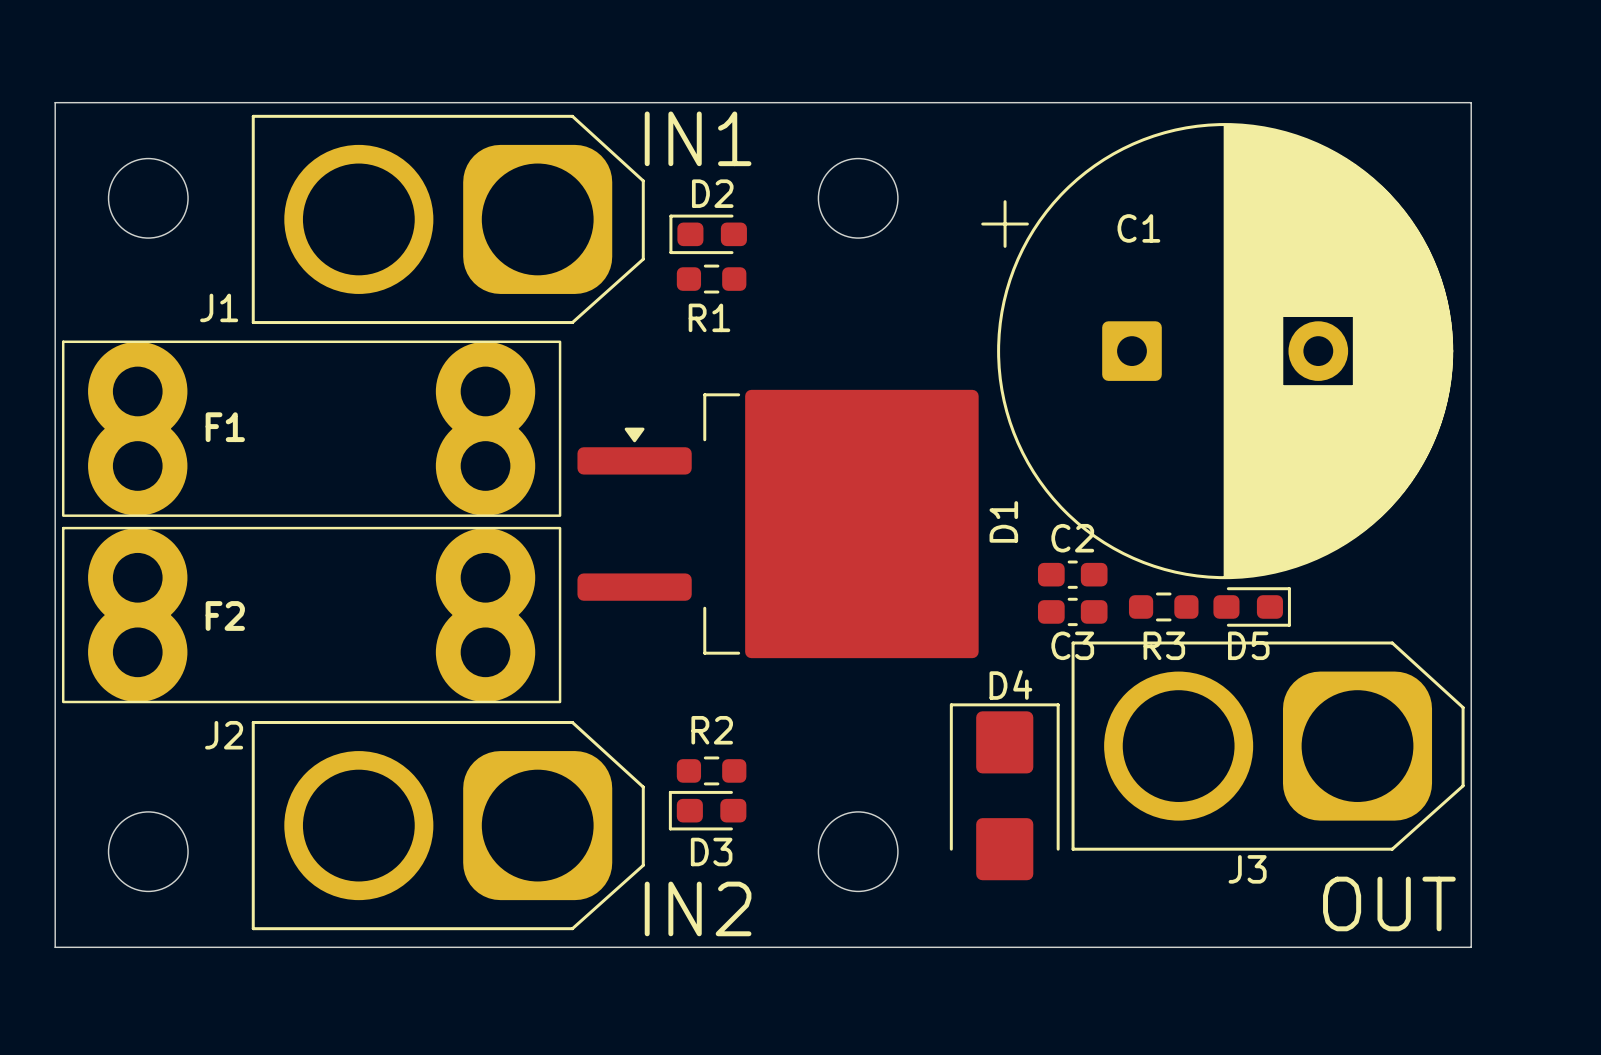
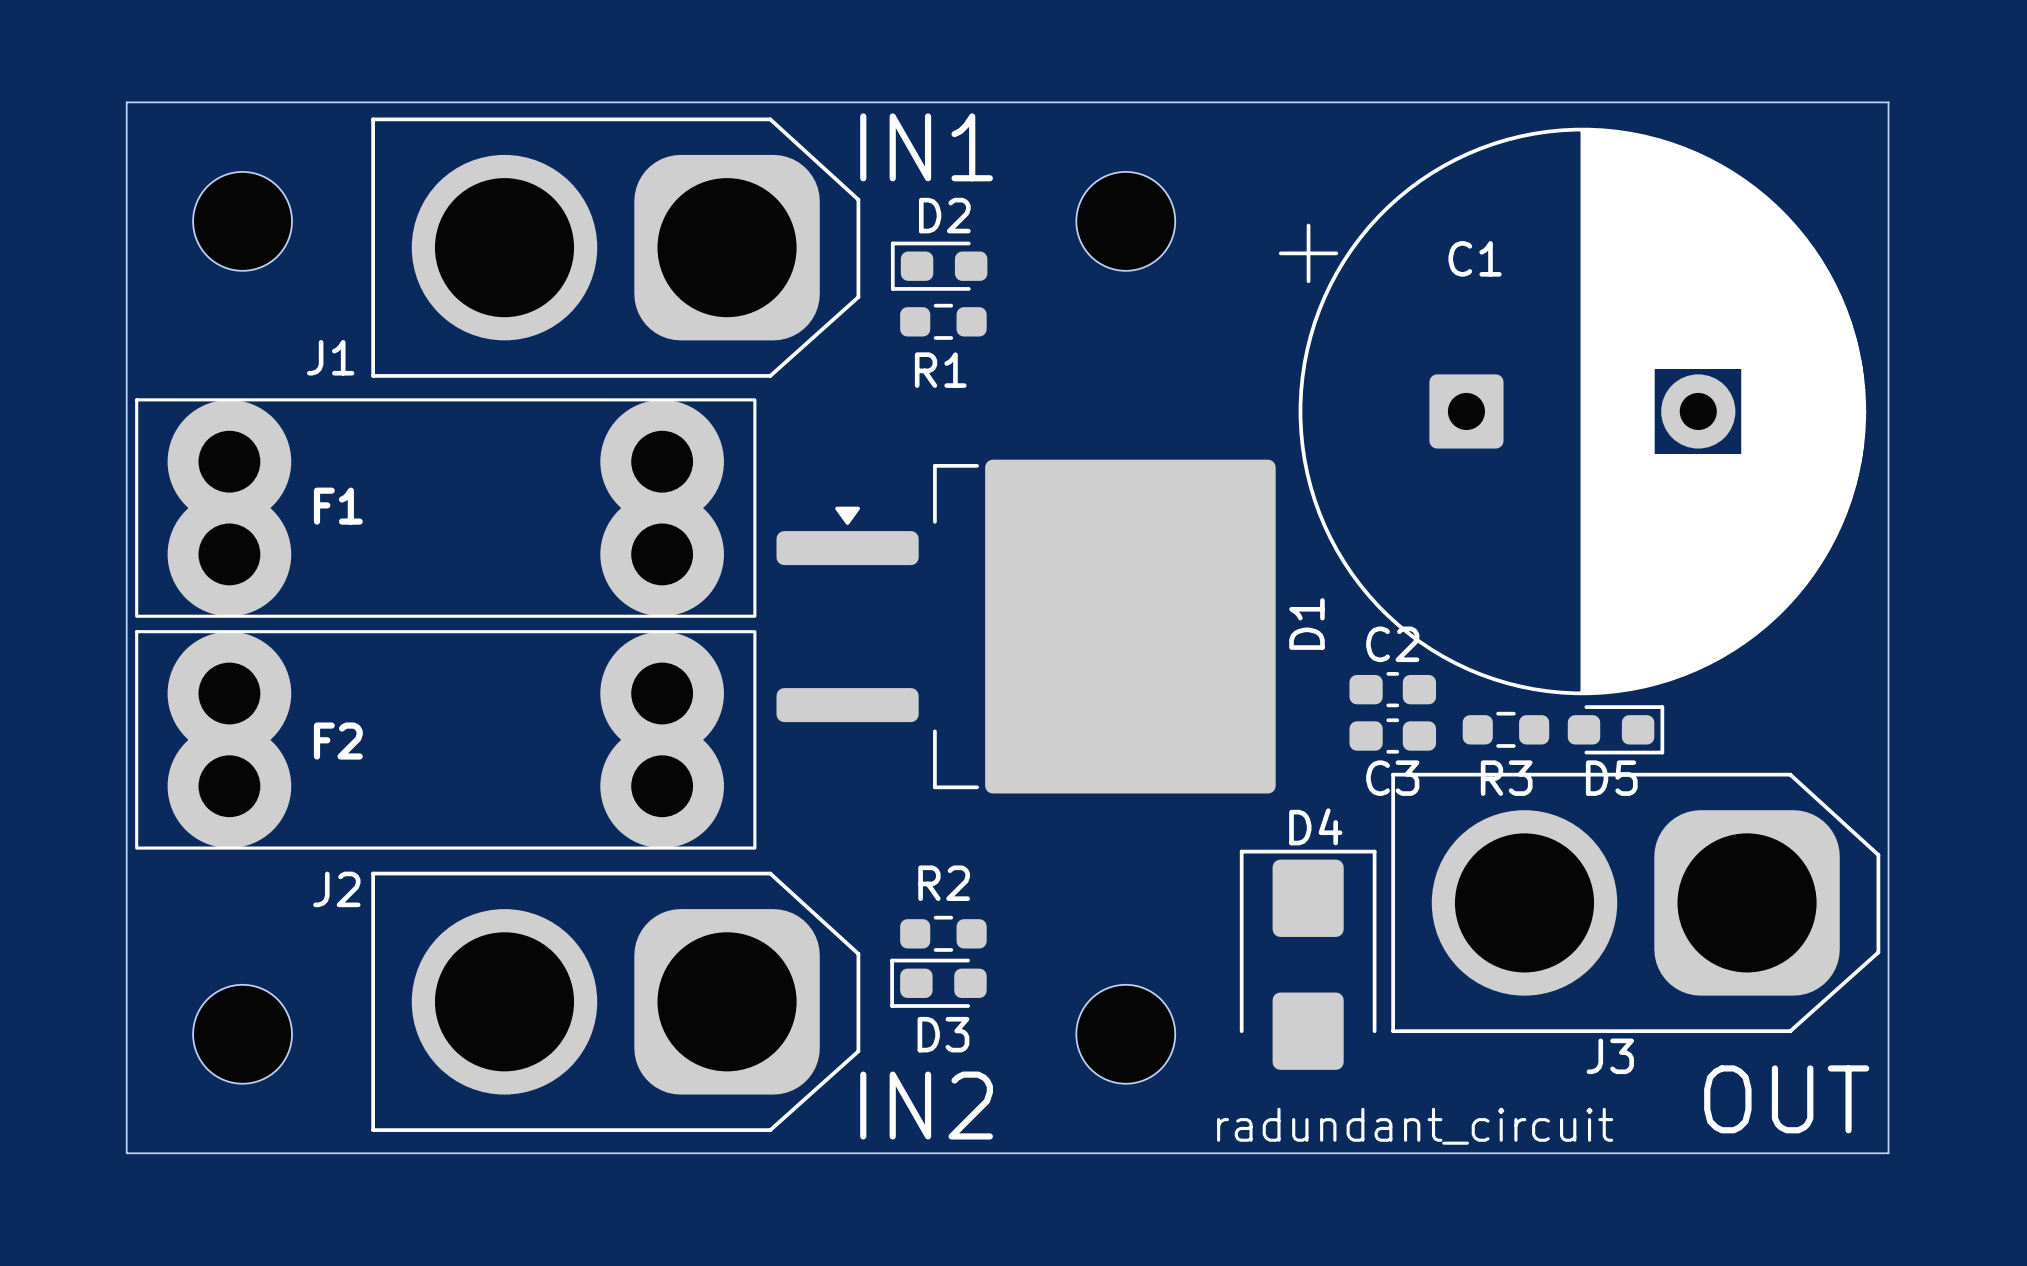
text: none -> radundant_circuit (1415, 1126)

